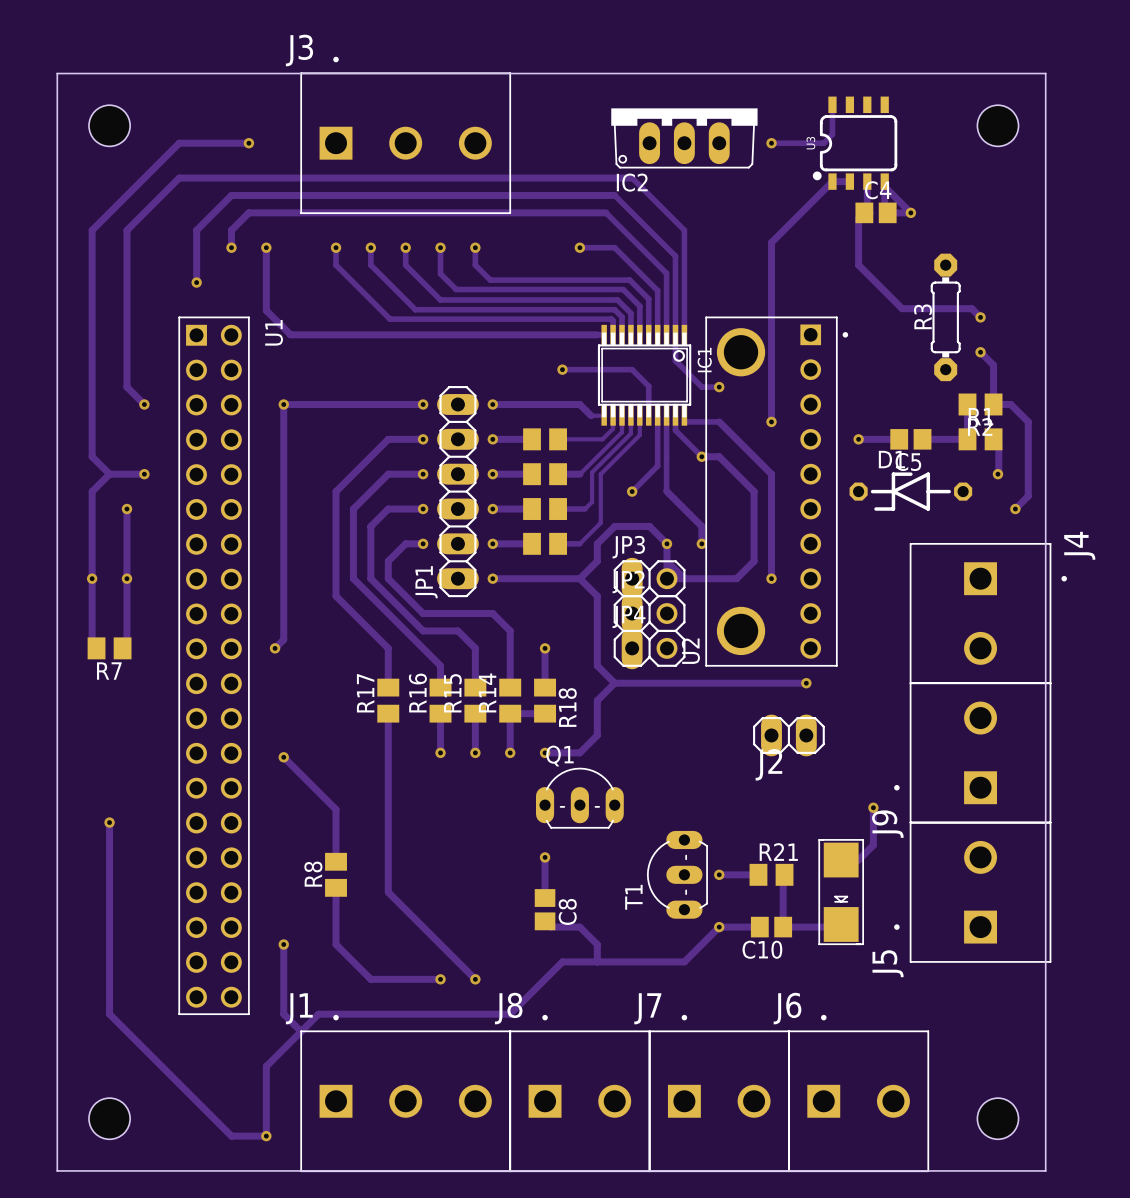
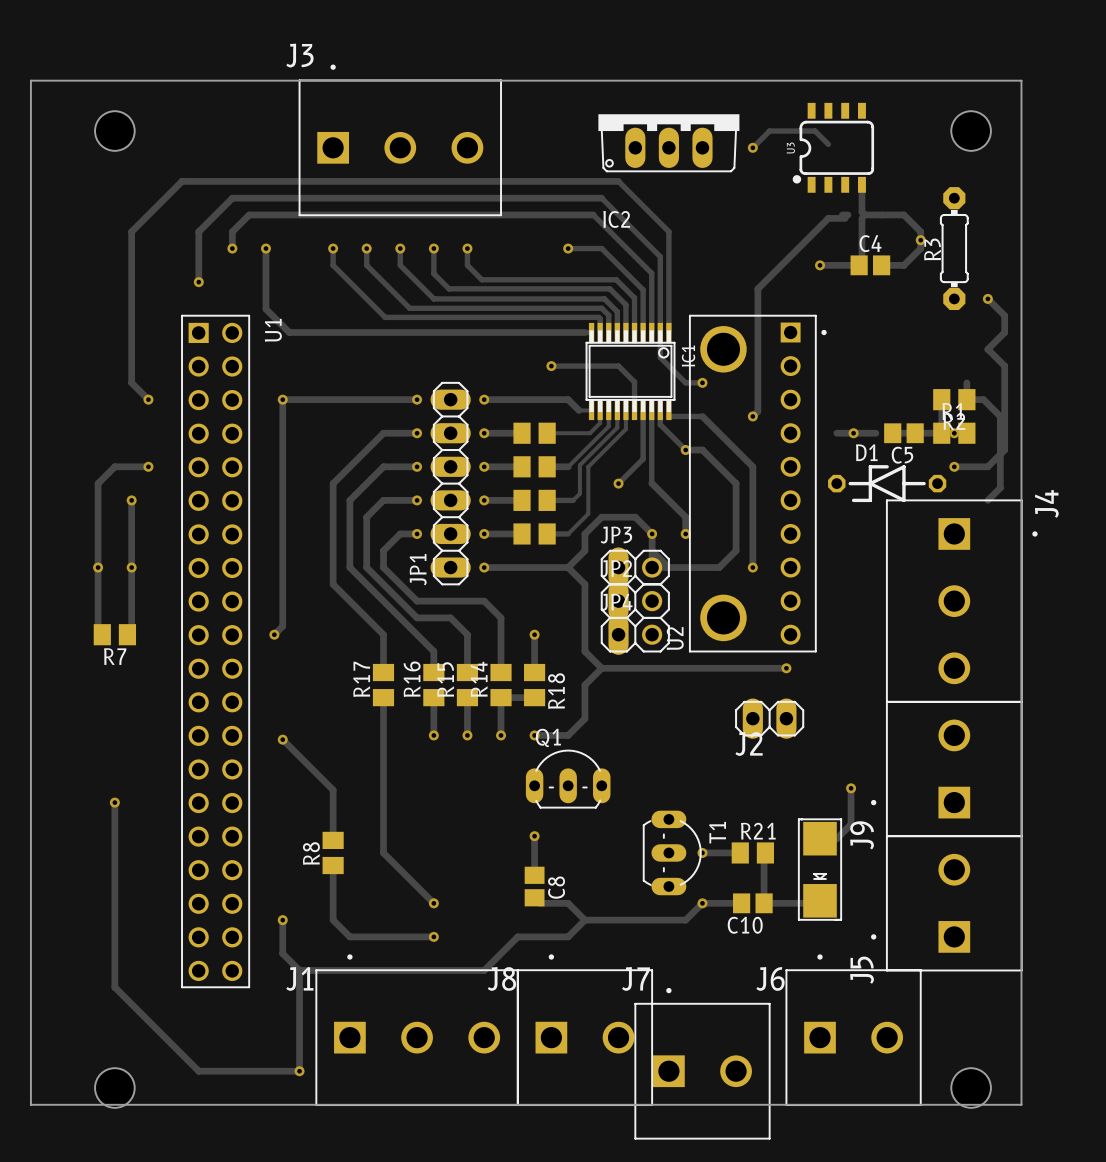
board edge: (57, 73) (57, 1170) (1045, 1170) (1045, 73) -> (64, 80) (30, 80) (30, 1104) (1021, 1104) (1021, 80) (1017, 80)
track: (832, 104) (832, 134) (823, 143) (771, 143) -> (828, 144) (815, 131) (769, 131) (752, 147)
track: (248, 143) (179, 143) (92, 230) (92, 456) (109, 474) -> none
via: (248, 143) -> none
track: (849, 181) (832, 181) (771, 242) (771, 421) -> (845, 218) (828, 218) (757, 288) (757, 411) (752, 416)
track: (867, 181) (867, 209) (858, 218) (858, 265) (902, 308) (971, 308) (980, 317) -> none
IC2 name position: IC2 (632, 182) -> IC2 (616, 219)
track: (884, 186) (910, 212) -> (881, 265) (903, 265) (920, 248) (920, 231) (903, 214) (887, 214)
C4 position: (876, 212) -> (870, 265)
via: (910, 212) -> none
track: none -> (861, 218) (861, 262) (859, 265) (820, 265)
via: none -> (920, 240)
via: none -> (820, 265)
track: none -> (987, 298) (1004, 315) (1004, 332) (987, 349) (1004, 366) (1004, 450) (987, 466) (954, 466)
via: none -> (987, 298)
R3 position: (945, 317) -> (954, 248)
via: (980, 317) -> none
track: (980, 352) (993, 365) (993, 387) -> none
via: (980, 352) -> none
via position: (858, 439) -> (853, 433)
C5 position: (910, 439) -> (903, 433)
via: none -> (954, 433)
track: (993, 439) (998, 444) (997, 474) -> none
via position: (997, 474) -> (954, 466)
via: (1015, 509) -> none
J4 footprint: [909, 542, 1067, 685] -> [886, 499, 1038, 703]
J4 name position: J4 (1079, 545) -> J4 (1046, 503)
J9 position: (972, 752) -> (946, 769)
T1 footprint: [646, 830, 708, 919] -> [642, 810, 702, 896]
track: (388, 874) (388, 892) (475, 979) -> (383, 852) (433, 903)
J5 position: (972, 892) -> (946, 903)
T1 name position: T1 (633, 897) -> T1 (717, 832)
via: none -> (433, 903)
track: (597, 944) (597, 961) -> none
track: (701, 944) (684, 961) (579, 961) -> (685, 920) (584, 920) (568, 936)
track: (353, 961) (370, 979) (440, 979) -> (349, 936) (433, 936)
track: (562, 961) (510, 1014) (318, 1014) (266, 1066) (266, 1136) (231, 1136) (196, 1101) -> (551, 936) (517, 936) (484, 970) (299, 970)
track: (283, 979) (283, 1014) (301, 1031) -> (282, 953) (299, 970)
via position: (440, 979) -> (433, 936)
via: (475, 979) -> none
track: none -> (299, 970) (299, 1071) (198, 1071)
J1 position: (405, 1093) -> (417, 1030)
J8 position: (579, 1093) -> (584, 1030)
J6 position: (858, 1093) -> (853, 1030)
via position: (266, 1136) -> (299, 1071)

